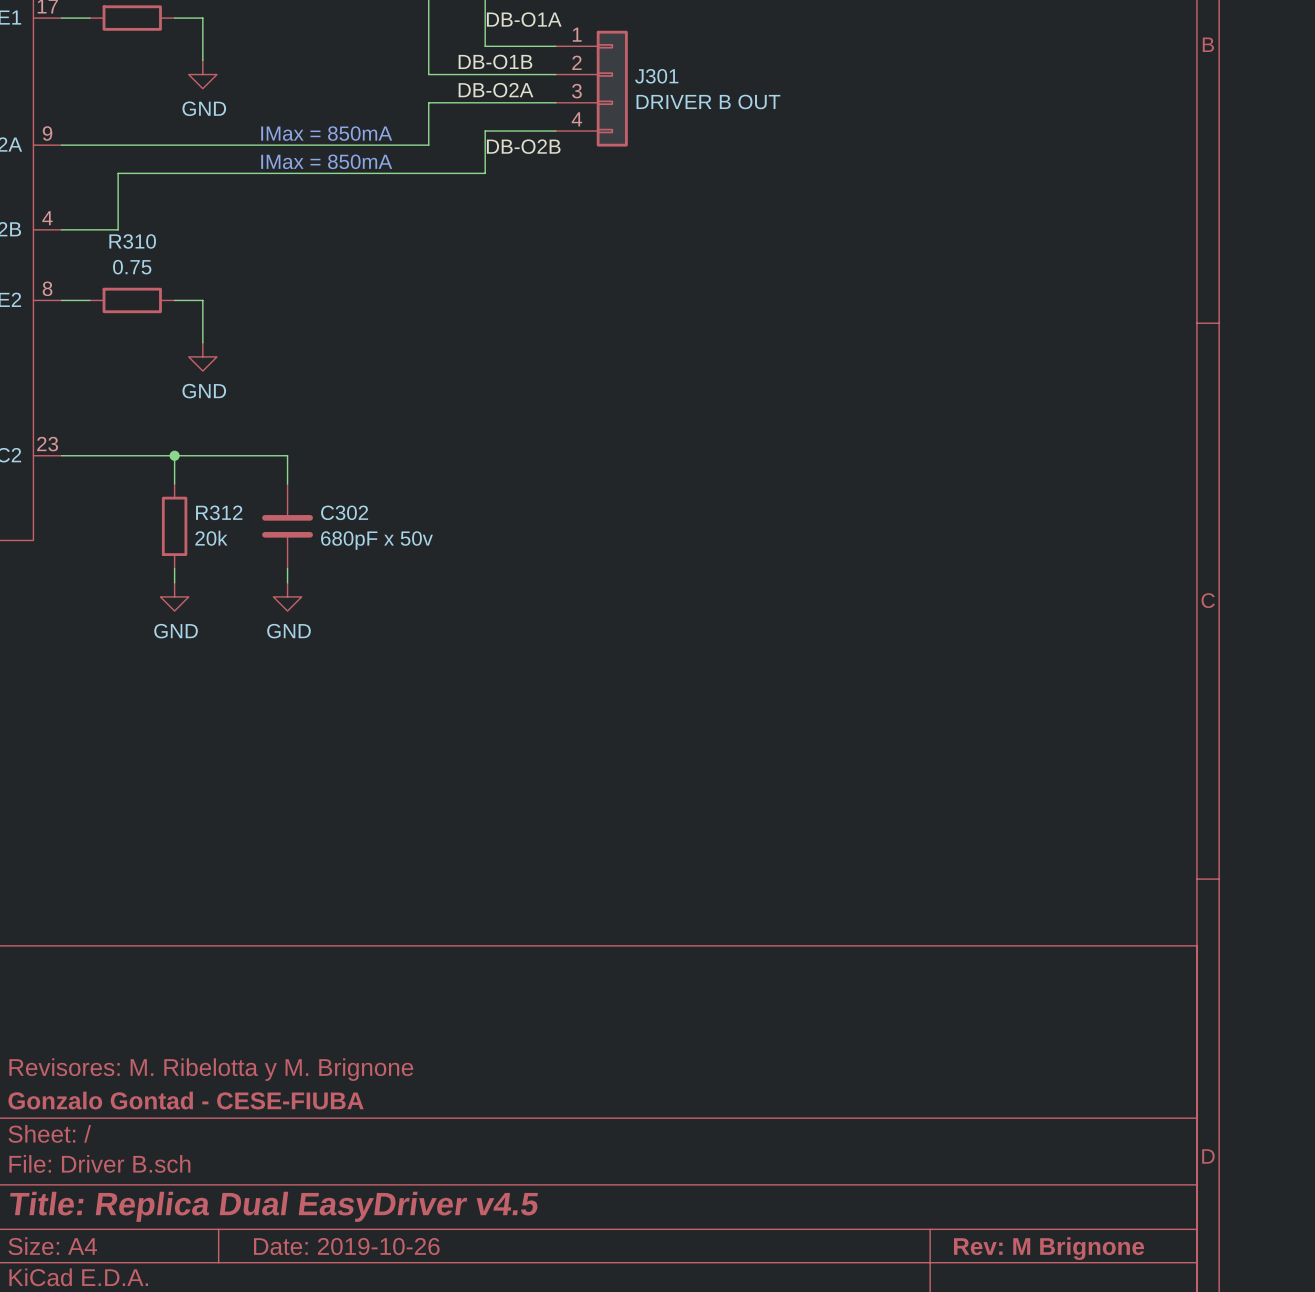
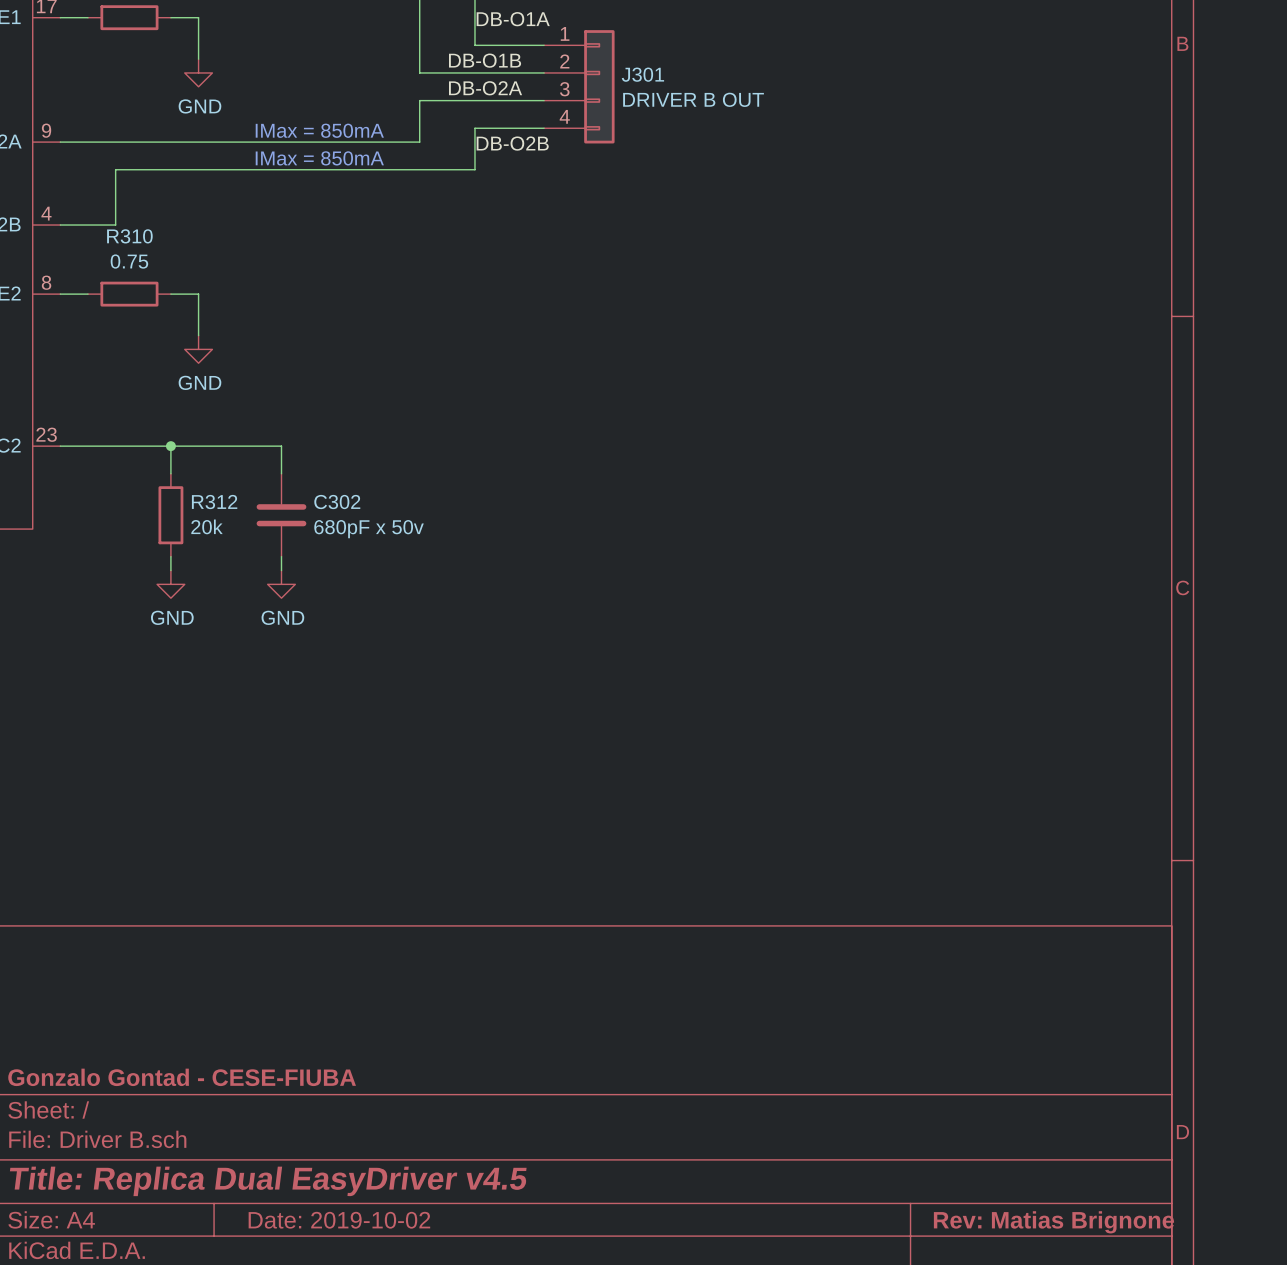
title block: Revisores: M. Ribelotta y M. Brignone (211, 1069) -> none
title block: Date: 2019-10-26 (346, 1246) -> Date: 2019-10-02 (339, 1220)
title block: Rev: M Brignone (1049, 1248) -> Rev: Matias Brignone (1053, 1222)

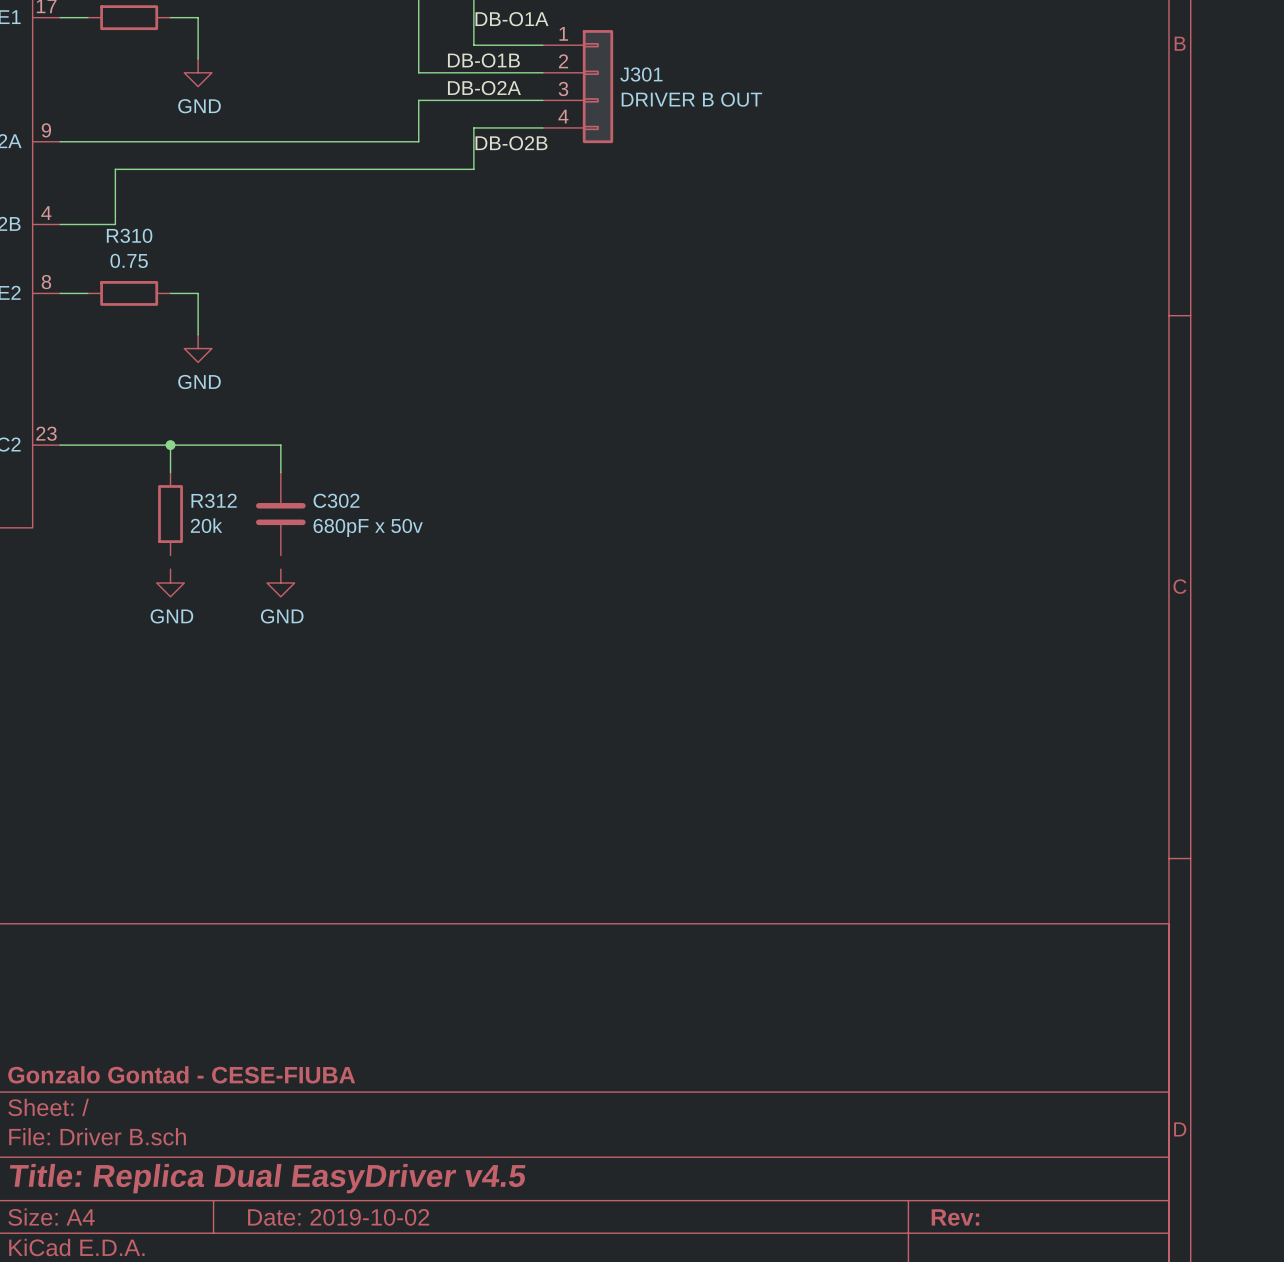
text: IMax = 850mA (319, 130) -> none
text: IMax = 850mA (319, 158) -> none
wire: (170, 556) (170, 570) -> none
wire: (281, 556) (281, 570) -> none
title block: Rev: Matias Brignone (1053, 1222) -> Rev: (955, 1217)

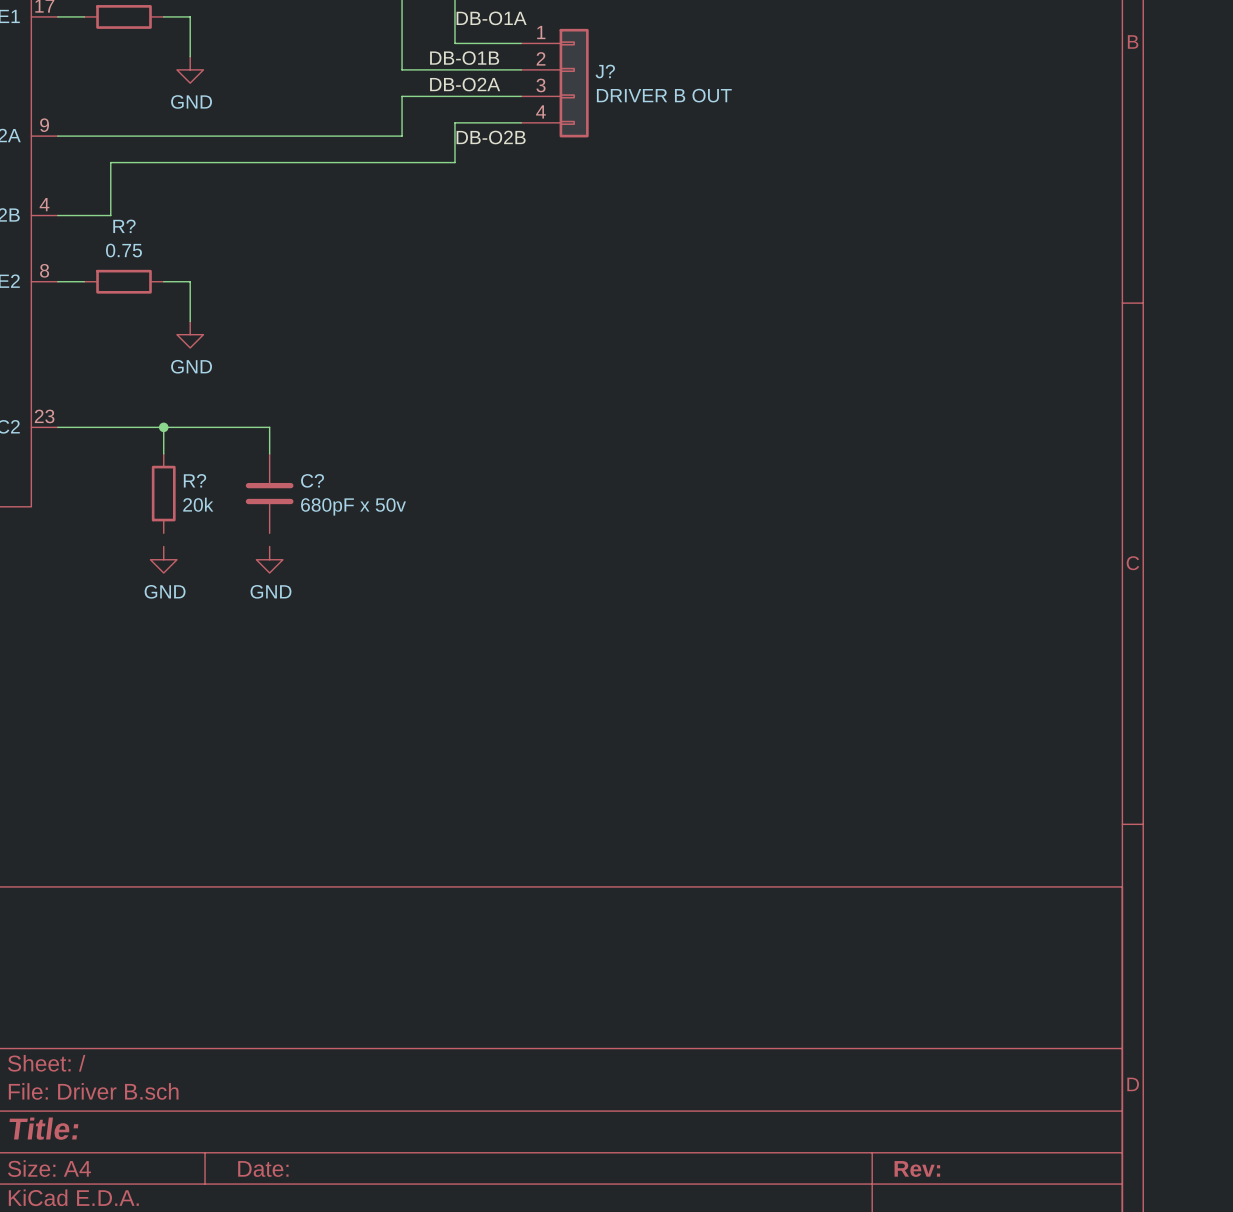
J301 name: J301 (641, 74) -> J? (605, 71)
R310 name: R310 (129, 235) -> R? (124, 226)
R312 name: R312 (214, 500) -> R? (195, 480)
C302 name: C302 (336, 500) -> C? (312, 480)
title block: Gonzalo Gontad - CESE-FIUBA (181, 1074) -> none
title block: Title: Replica Dual EasyDriver v4.5 (267, 1178) -> Title: (43, 1128)
title block: Date: 2019-10-02 (338, 1217) -> Date: (263, 1168)

